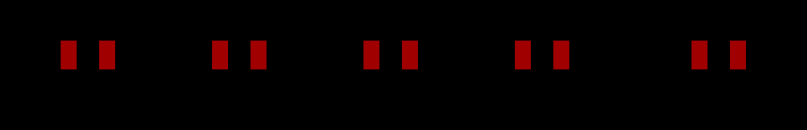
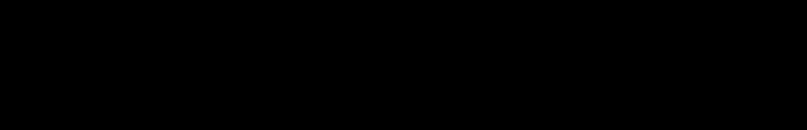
part: (87, 55) -> none
part: (239, 55) -> none
part: (390, 55) -> none
part: (542, 55) -> none
part: (718, 55) -> none

